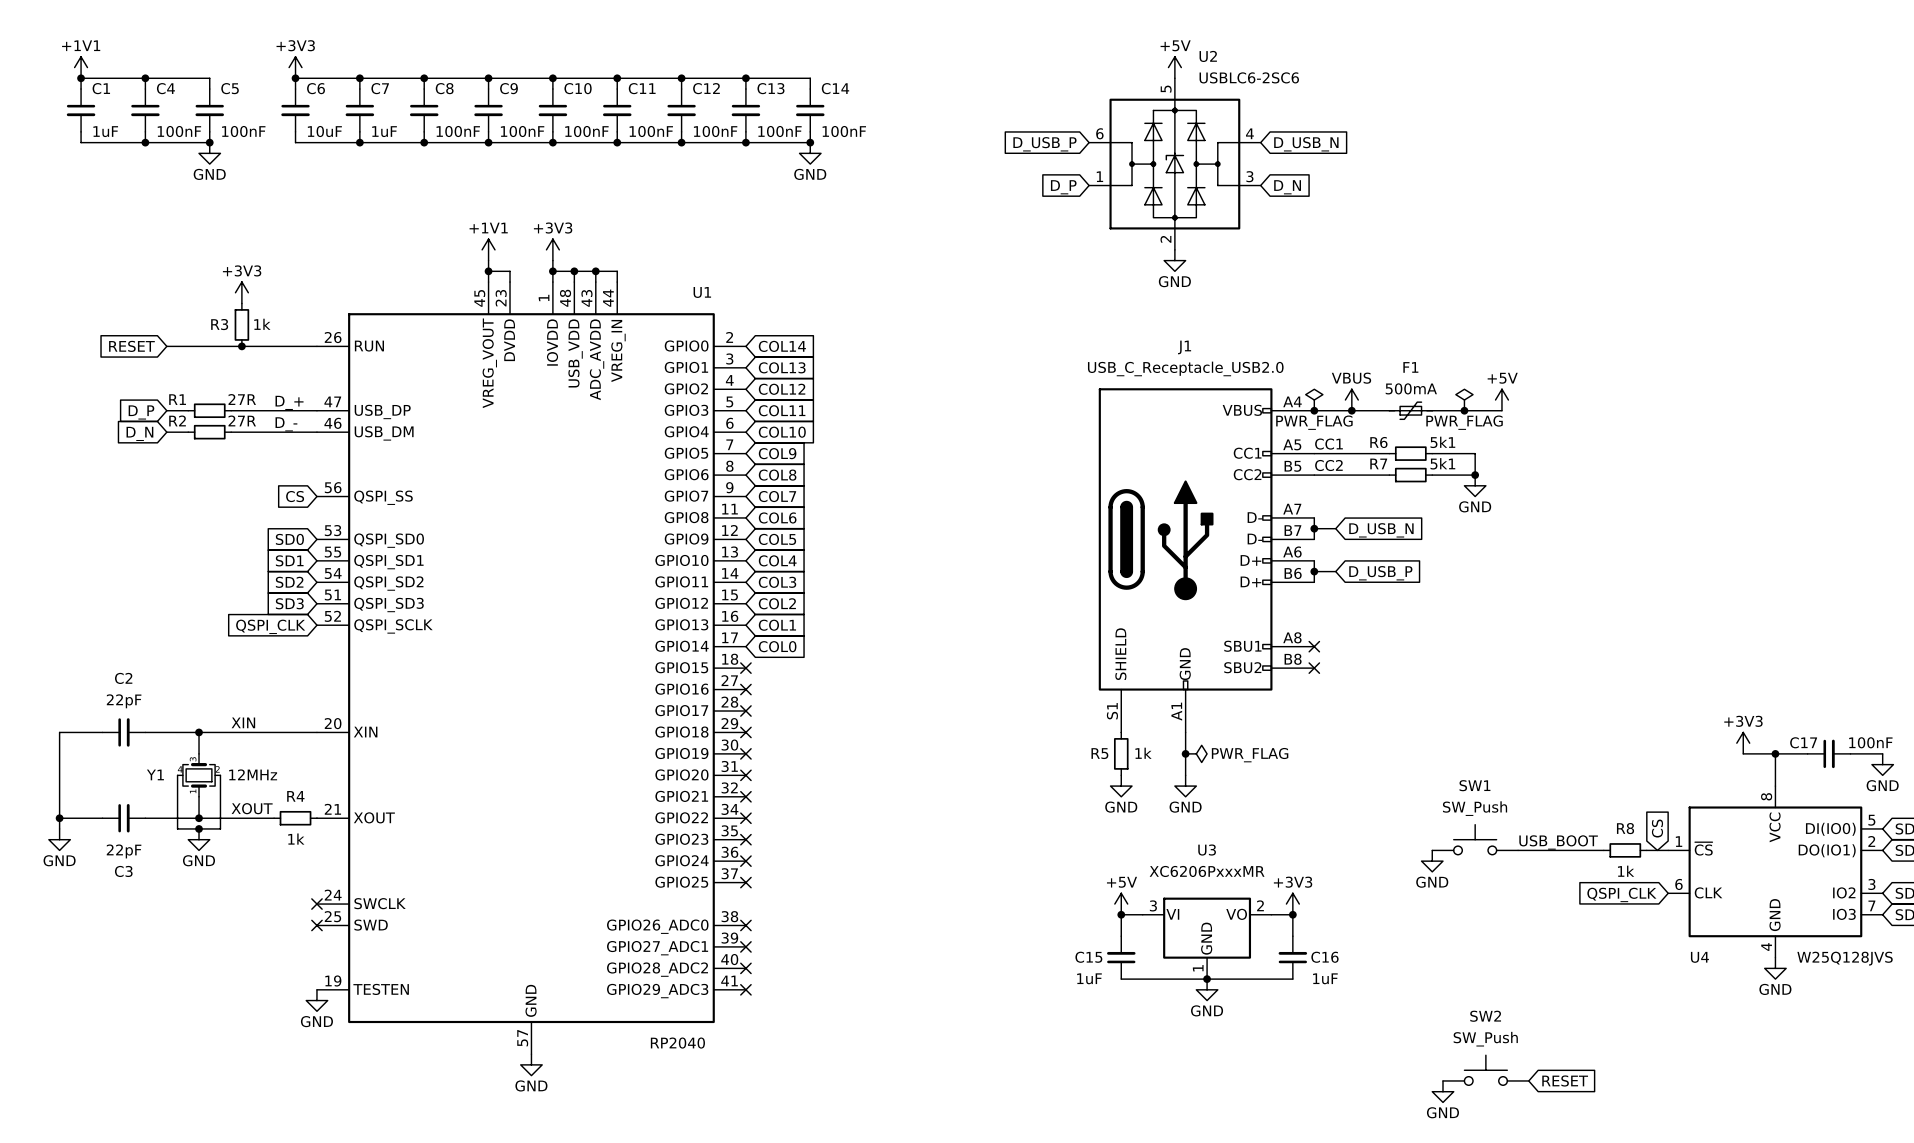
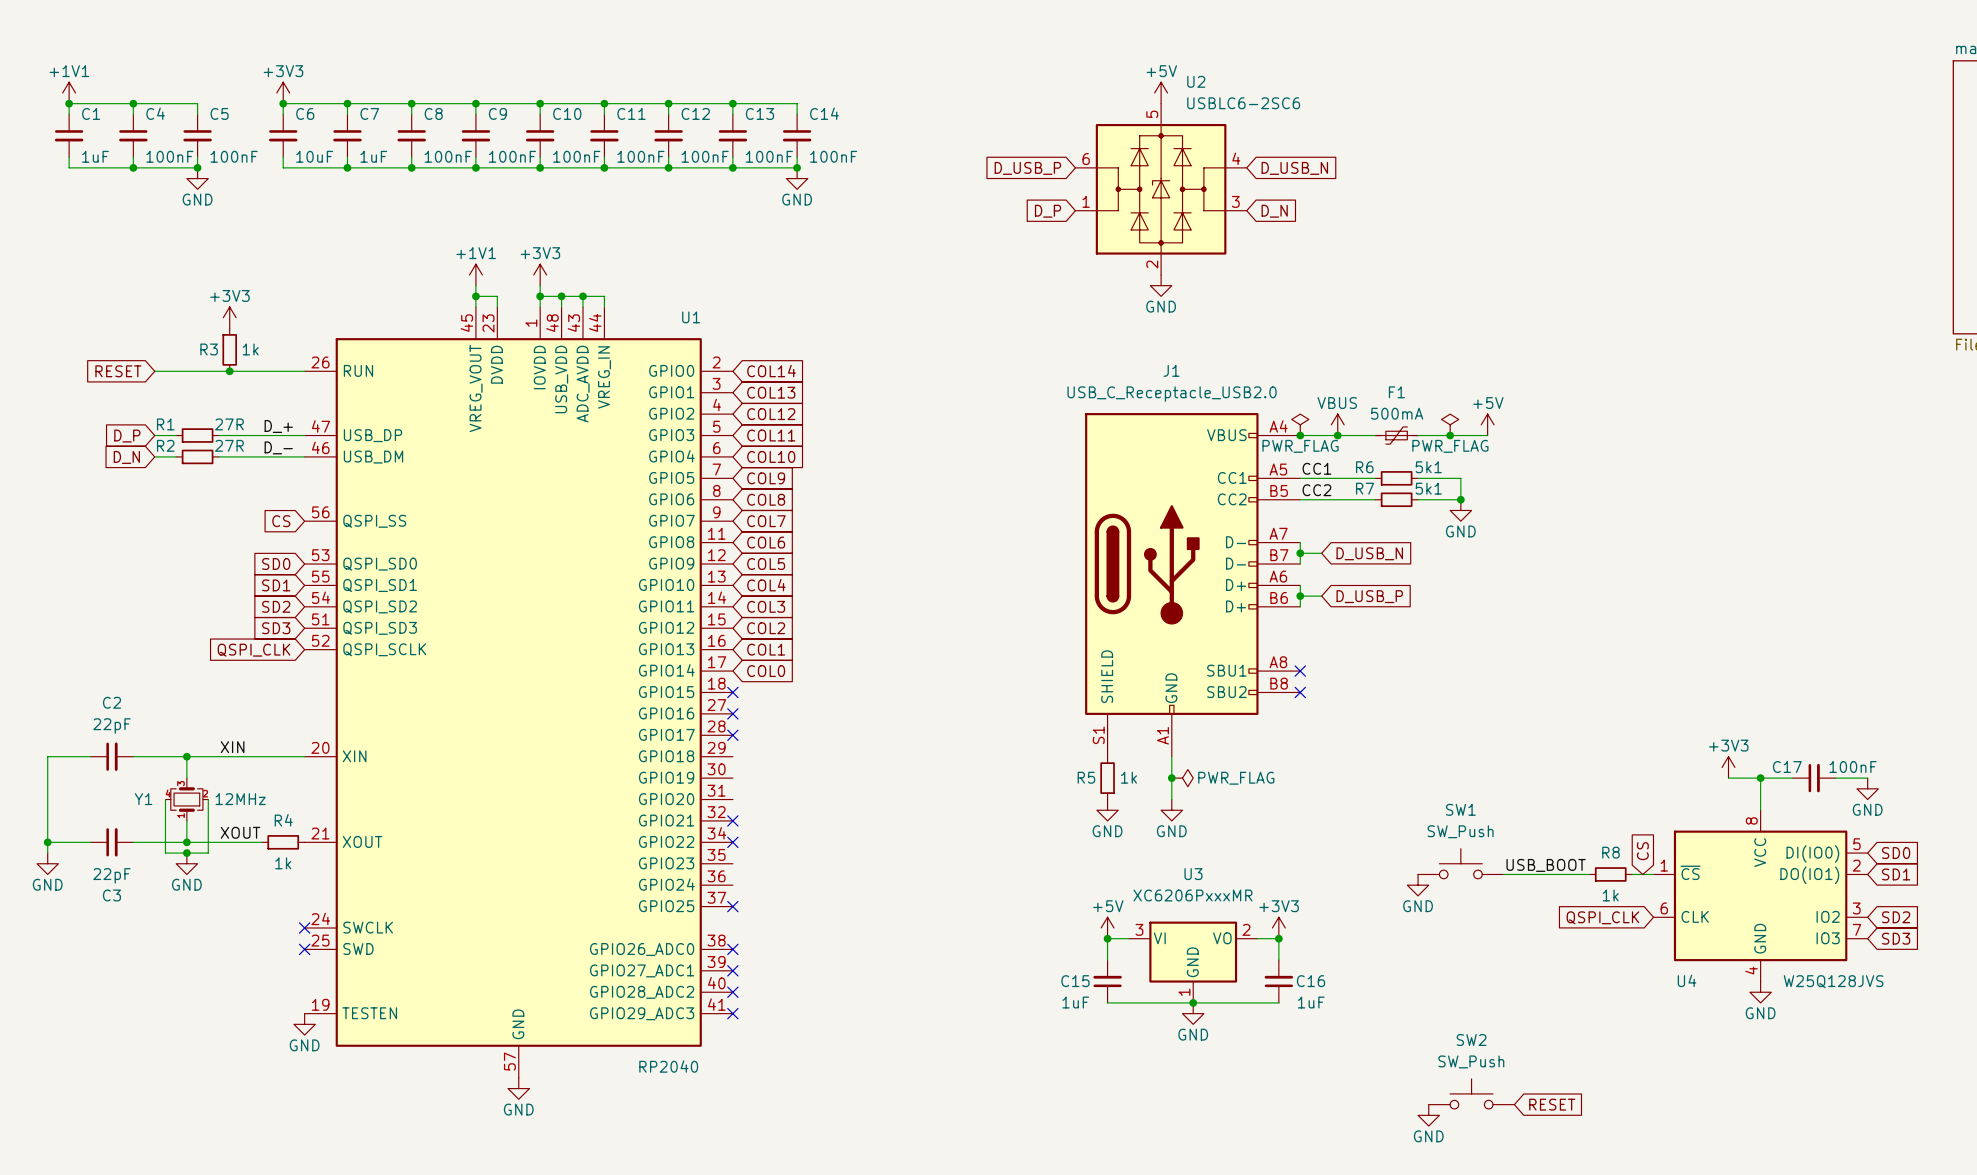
no-connect mark: (745, 732) -> none
no-connect mark: (745, 753) -> none
no-connect mark: (745, 775) -> none
no-connect mark: (745, 839) -> none
no-connect mark: (745, 861) -> none

